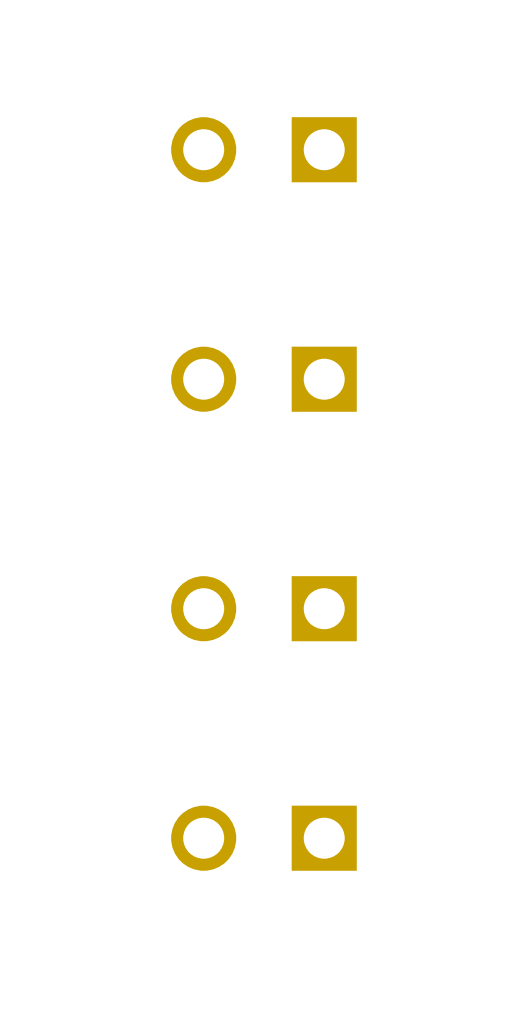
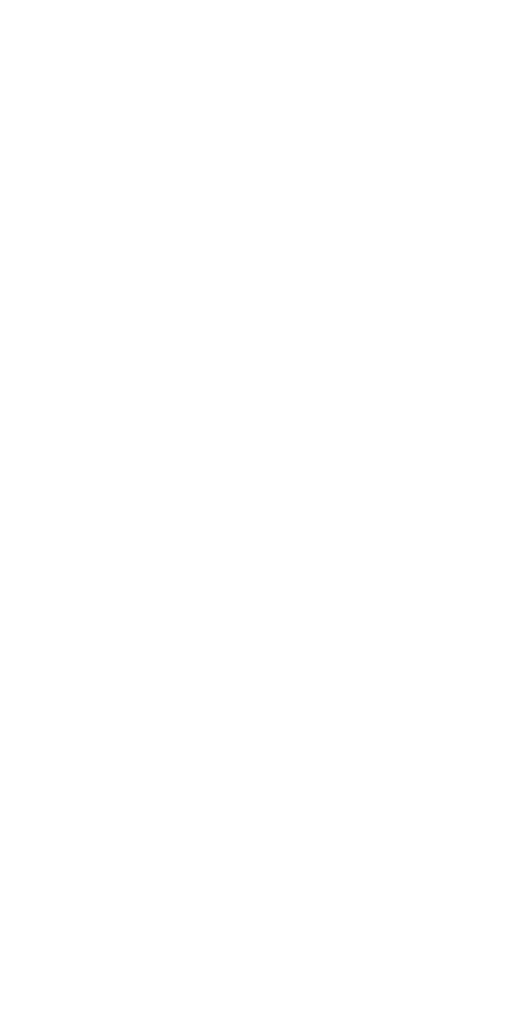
part: (263, 149) -> none
part: (263, 379) -> none
part: (263, 608) -> none
part: (263, 838) -> none

